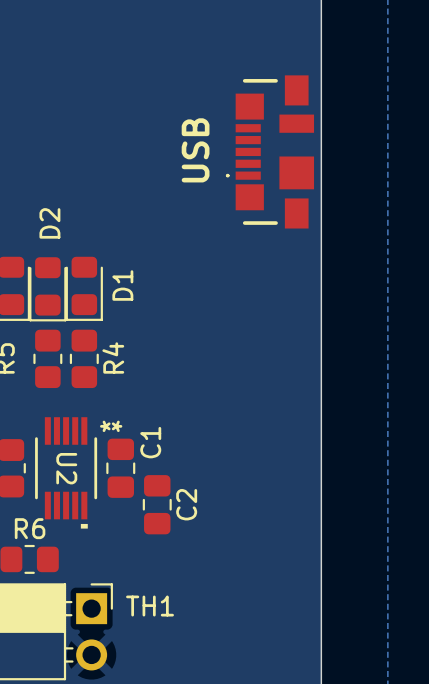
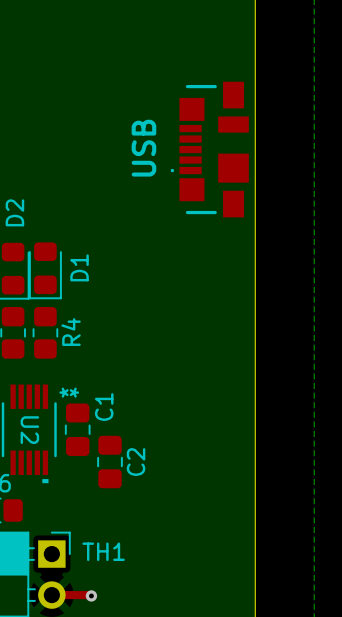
top track: none -> (51, 595) (91, 595)
via: none -> (91, 595)

